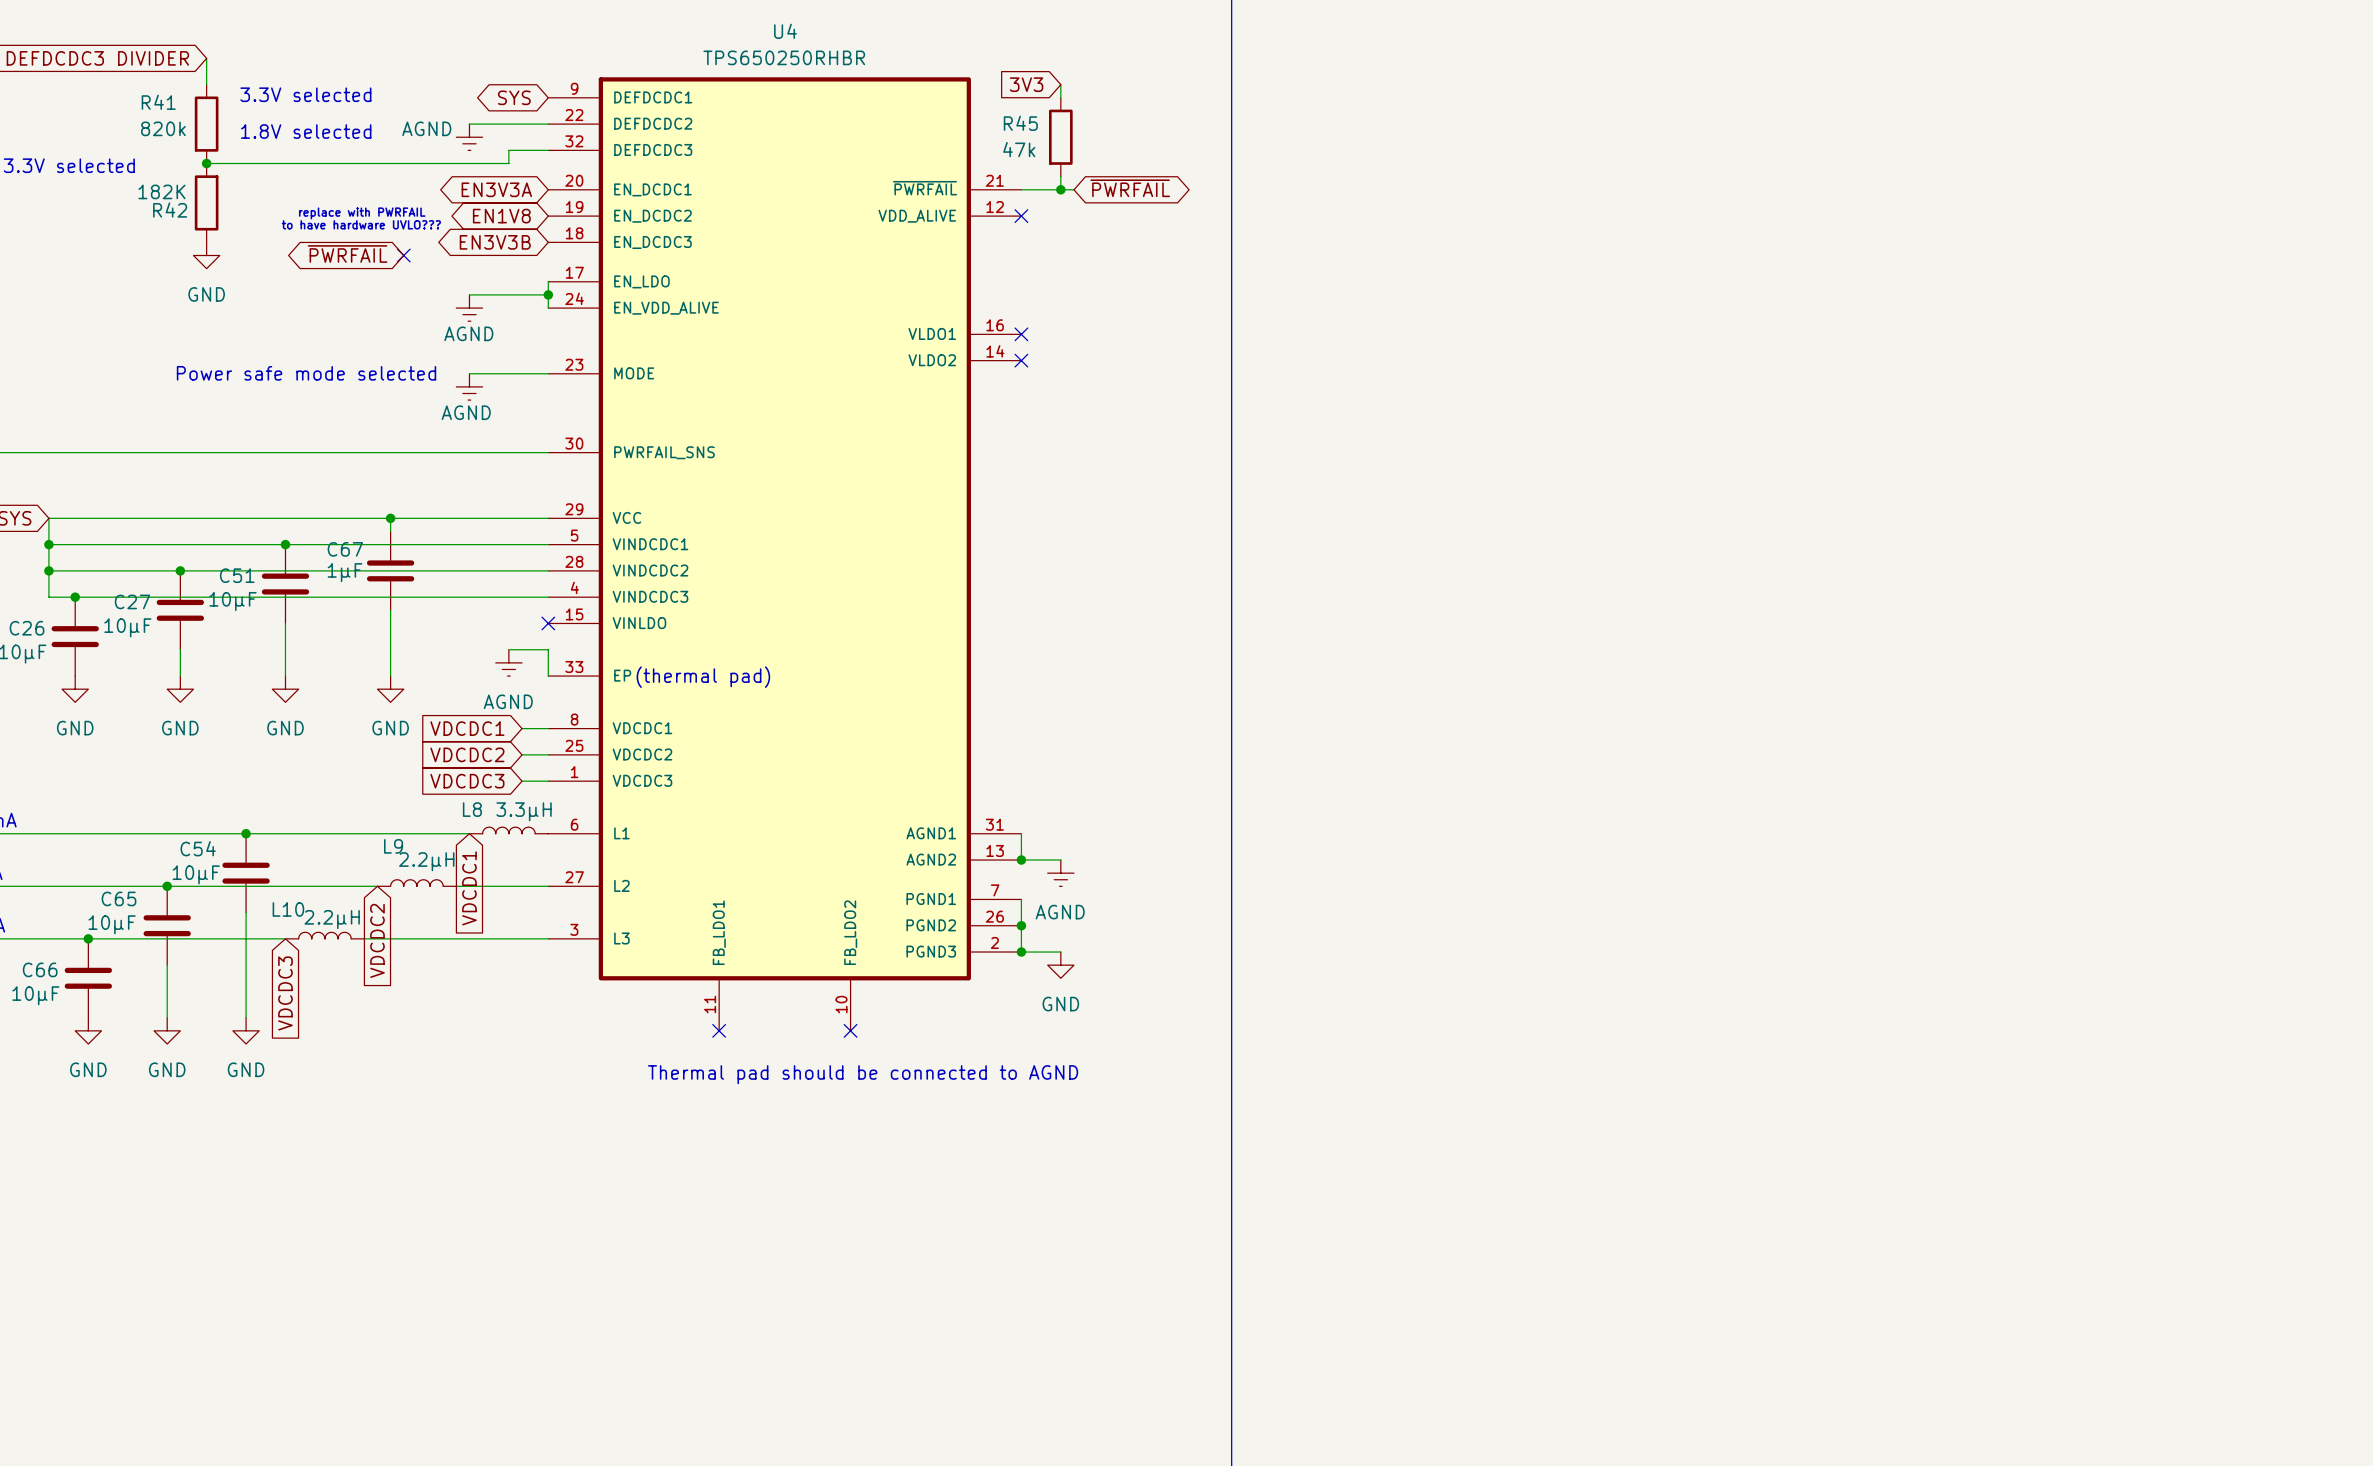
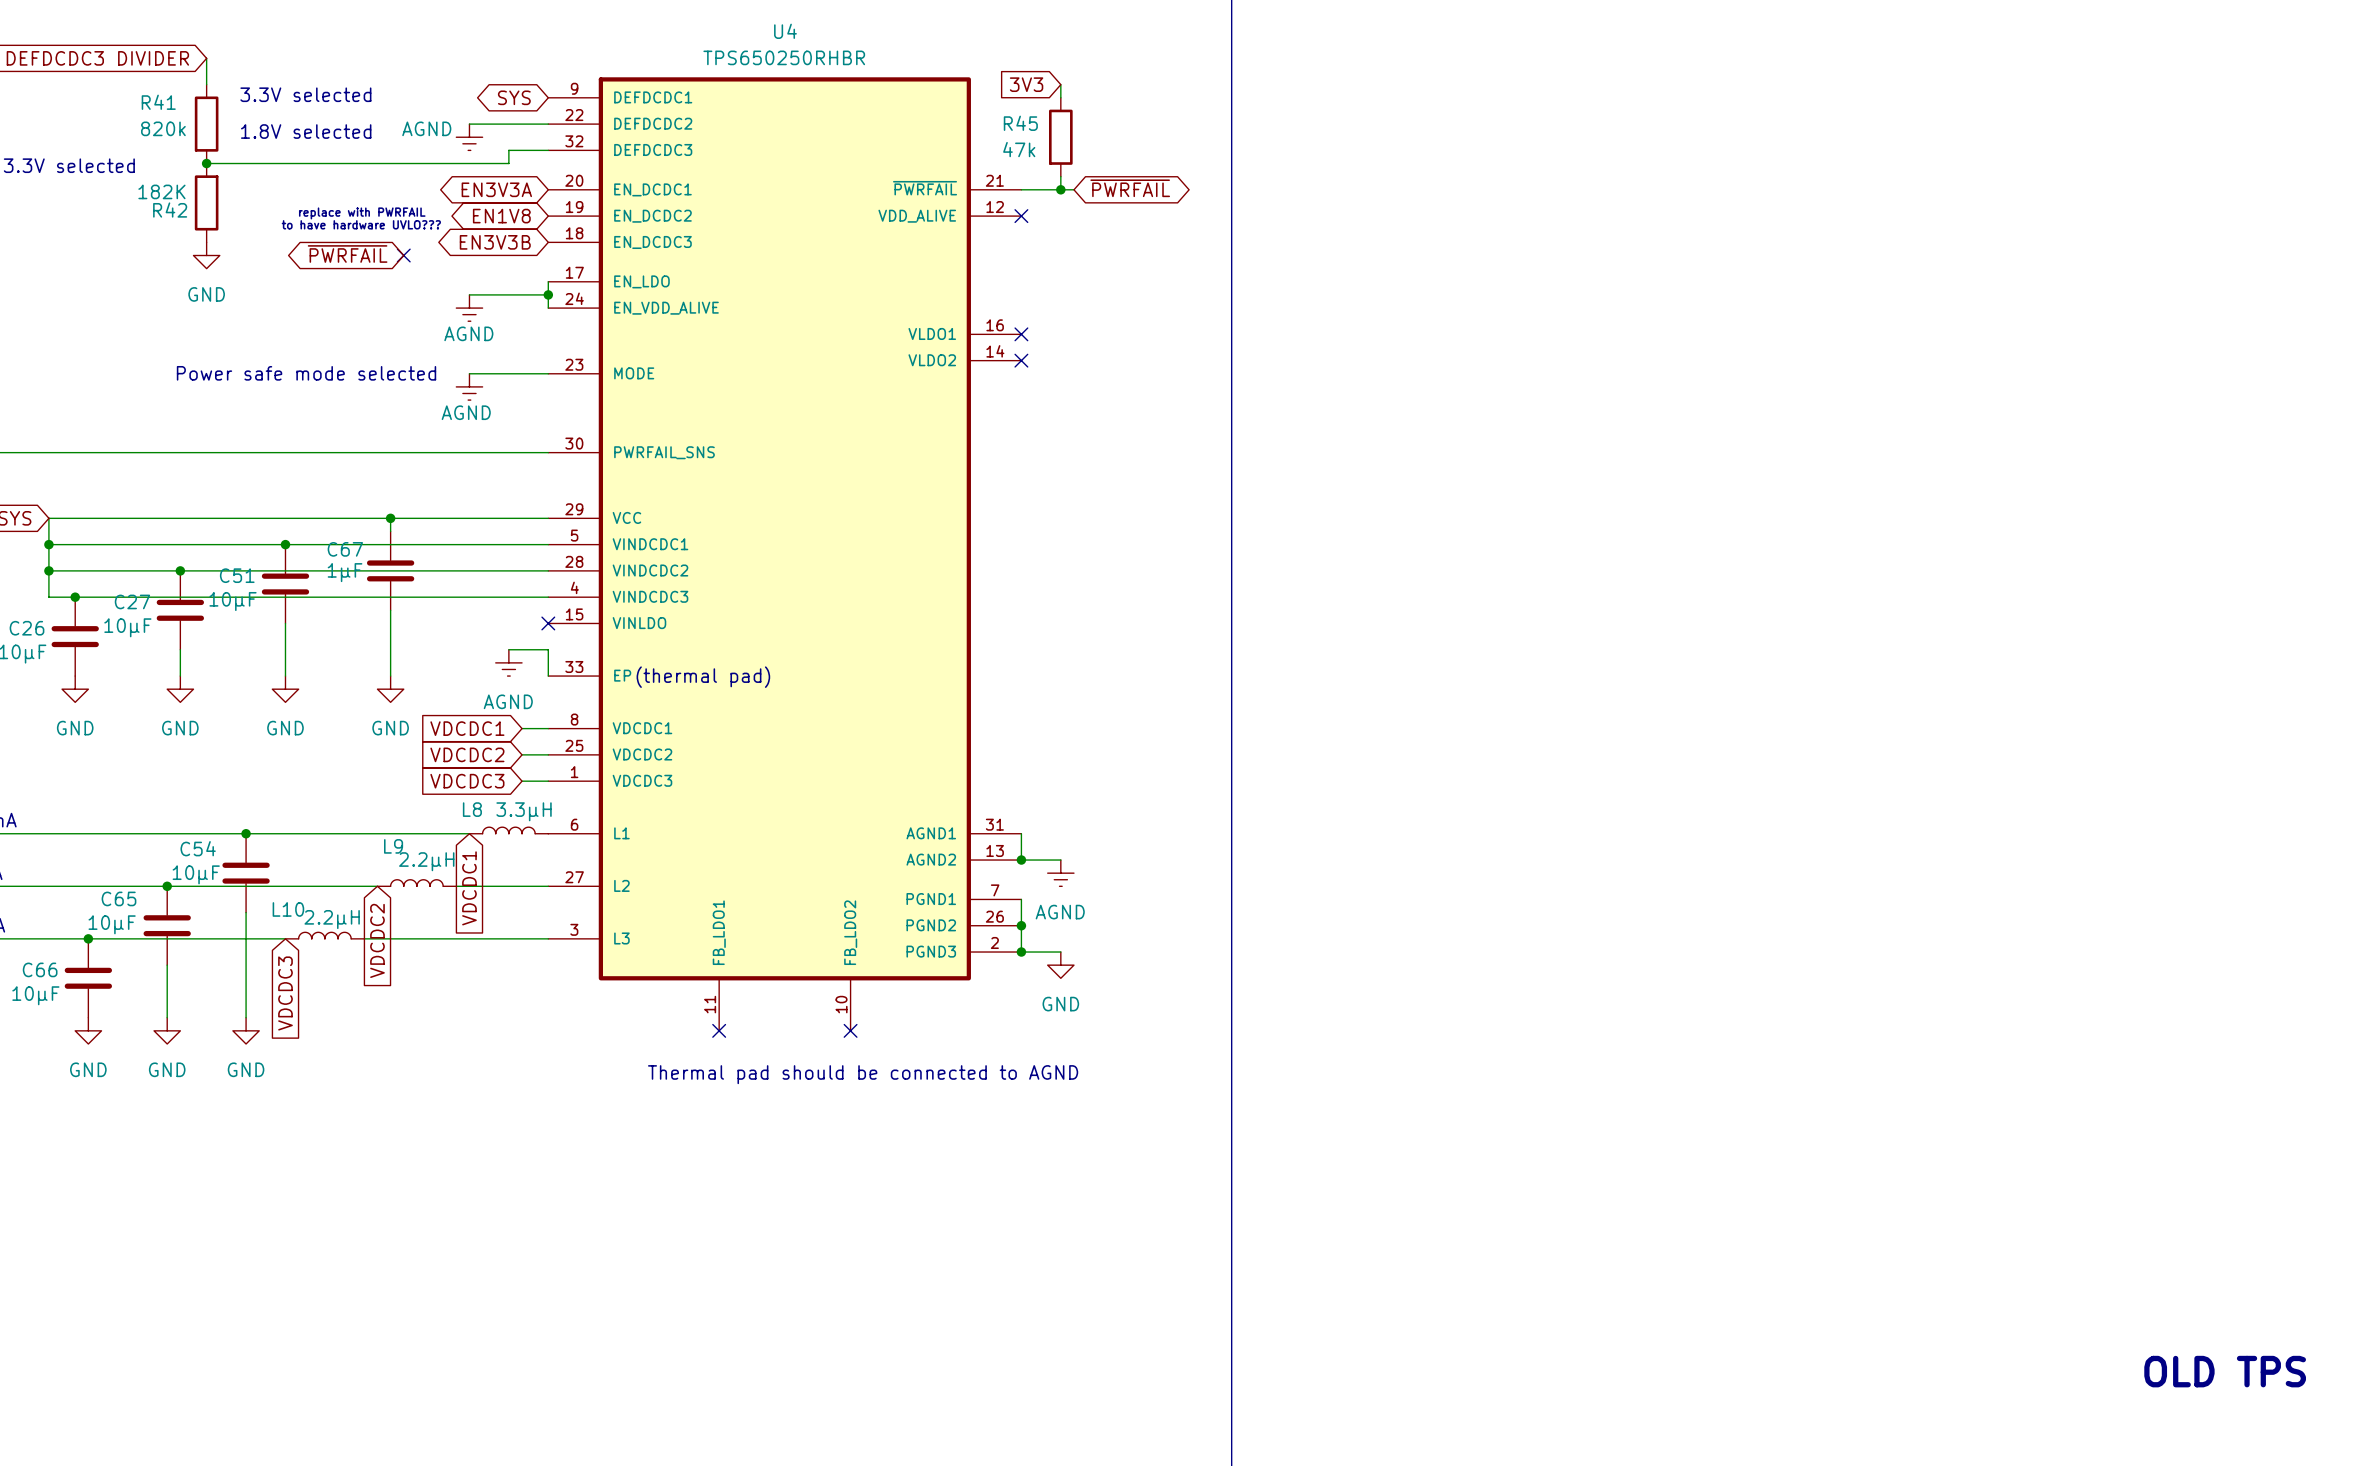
text: none -> OLD TPS (2225, 1371)

